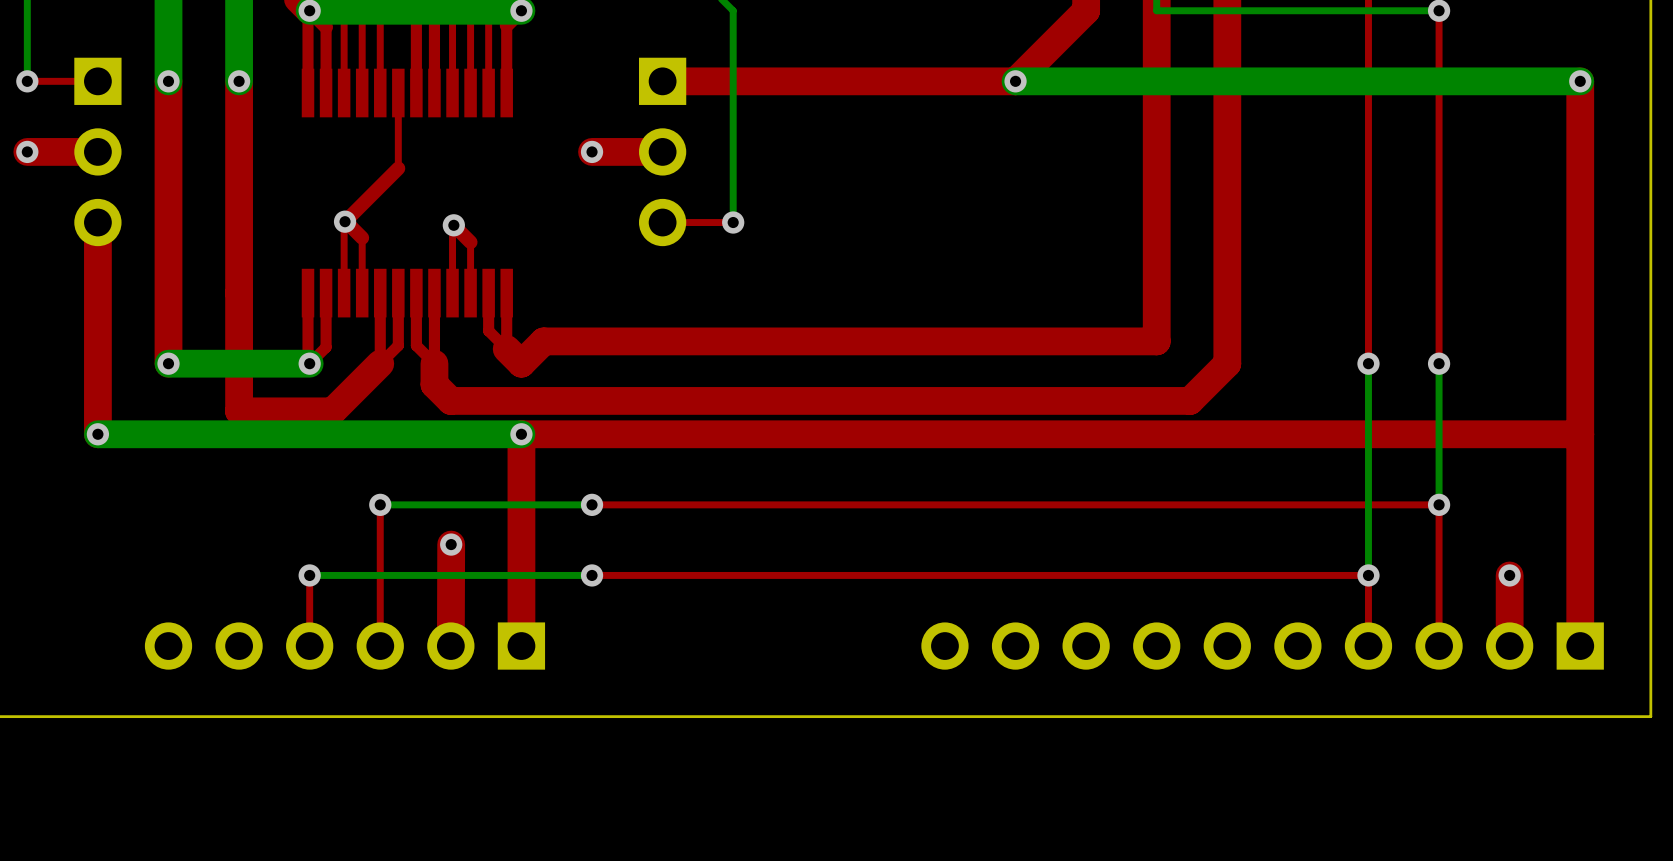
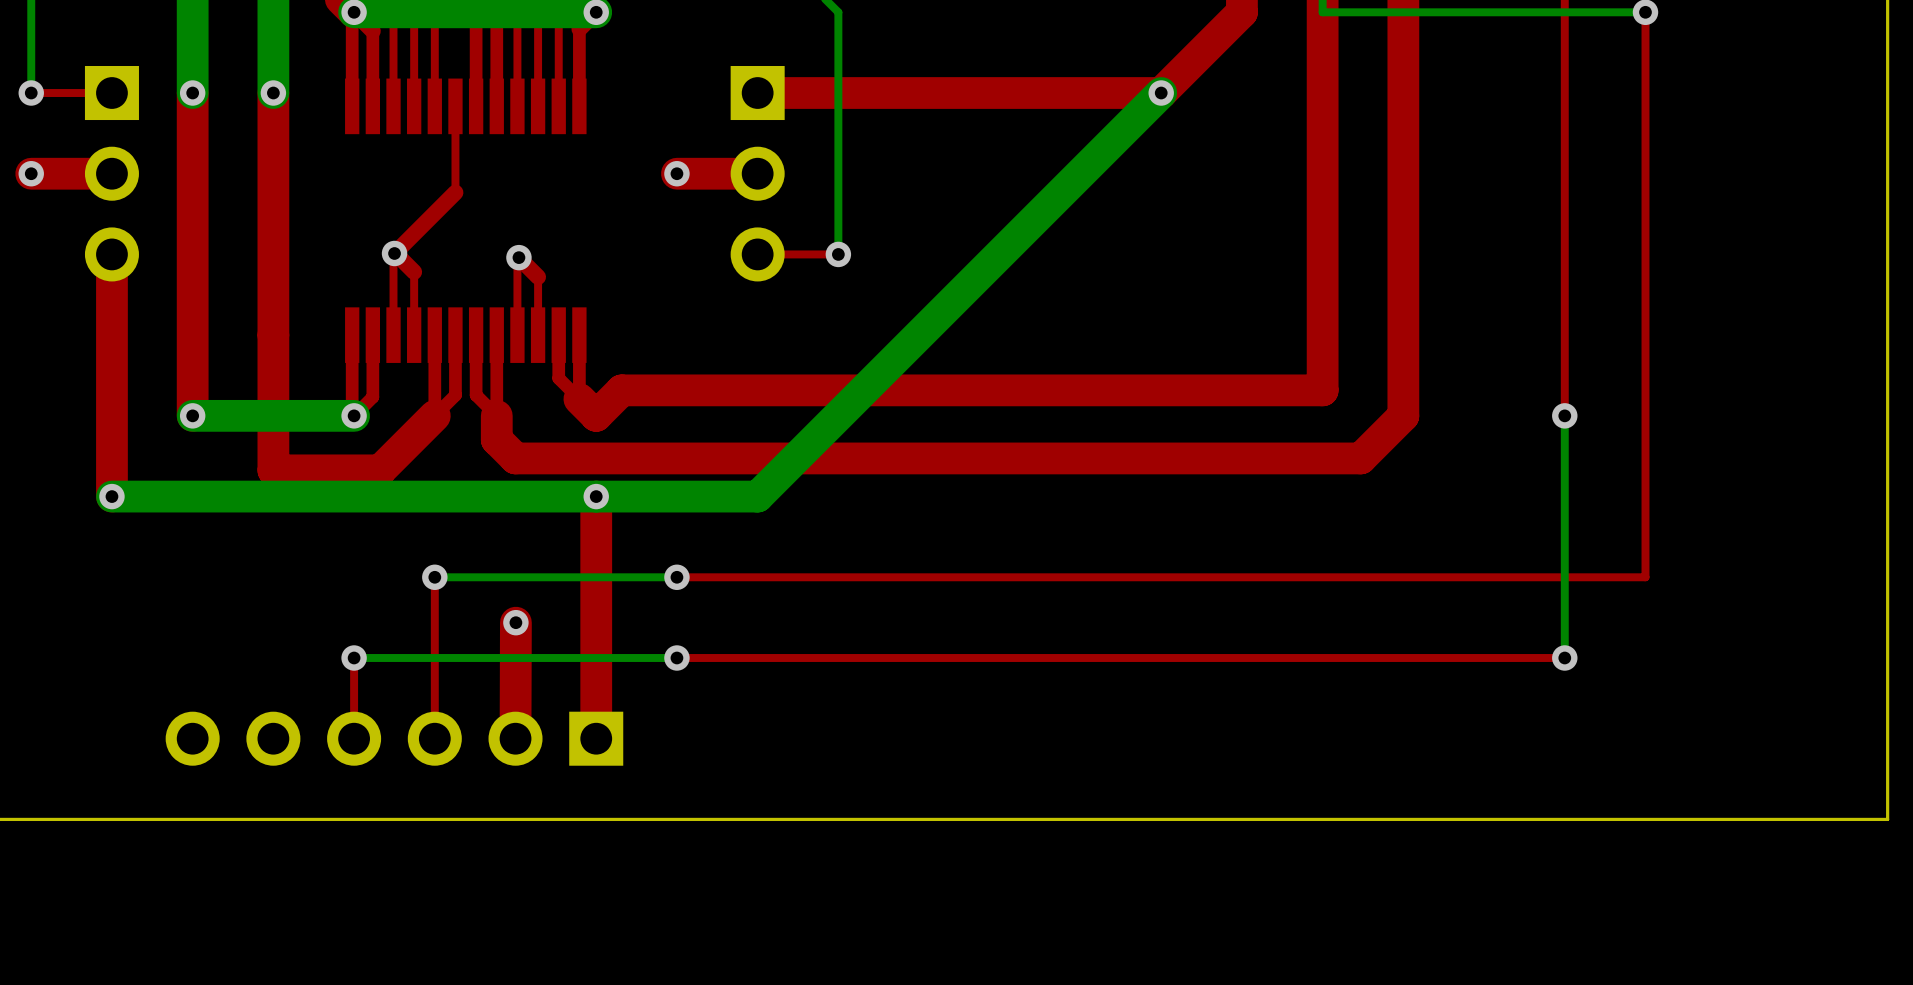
top track: (1580, 81) (1580, 646) -> none
bottom track: (1580, 81) (1015, 81) -> (596, 496) (757, 496) (1161, 93)
via: (1580, 81) -> none
bottom track: (1439, 363) (1439, 504) -> none
via: (1439, 363) -> none
top track: (1580, 434) (521, 434) -> none
top track: (1439, 504) (1439, 646) -> (1645, 577) (1645, 415)
via: (1439, 504) -> none
top track: (1368, 575) (1368, 646) -> none
top track: (1509, 575) (1509, 646) -> none
via: (1509, 575) -> none
part: (1262, 646) -> none

